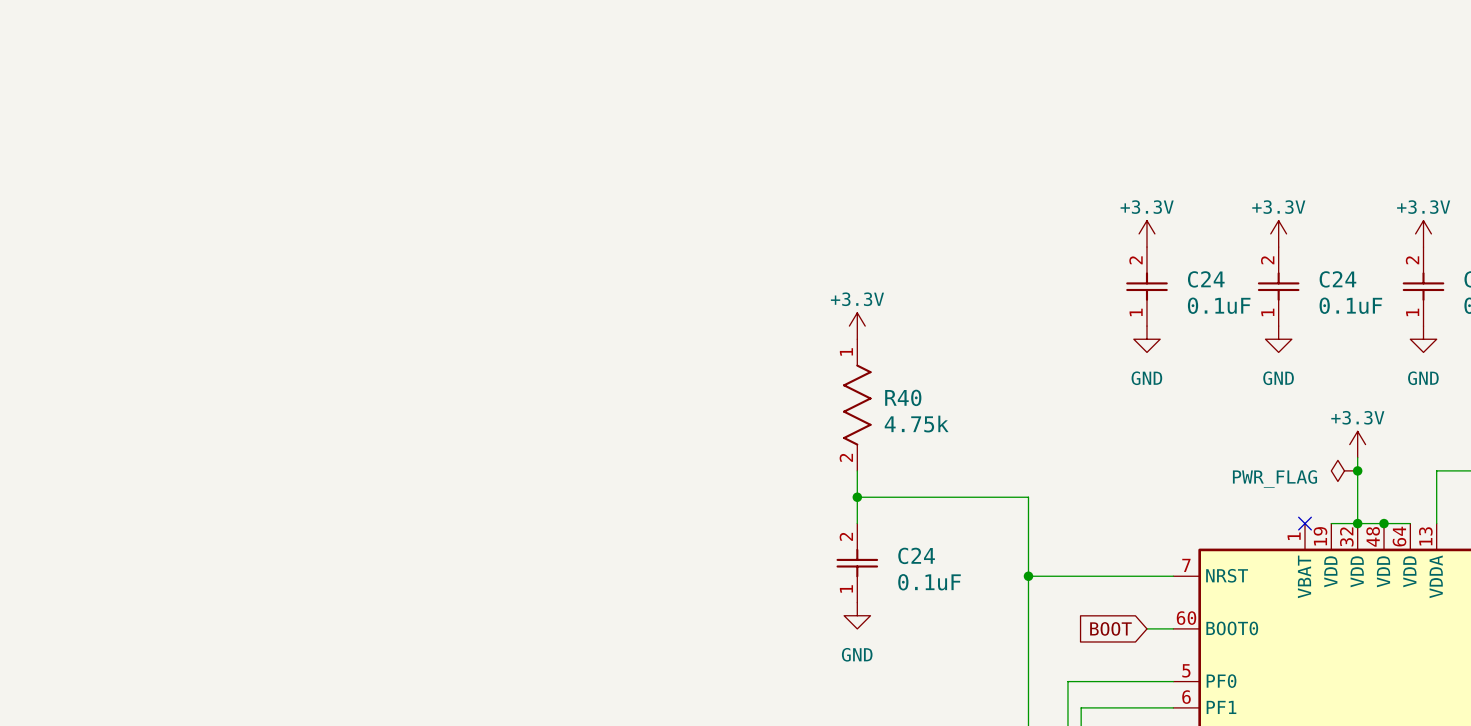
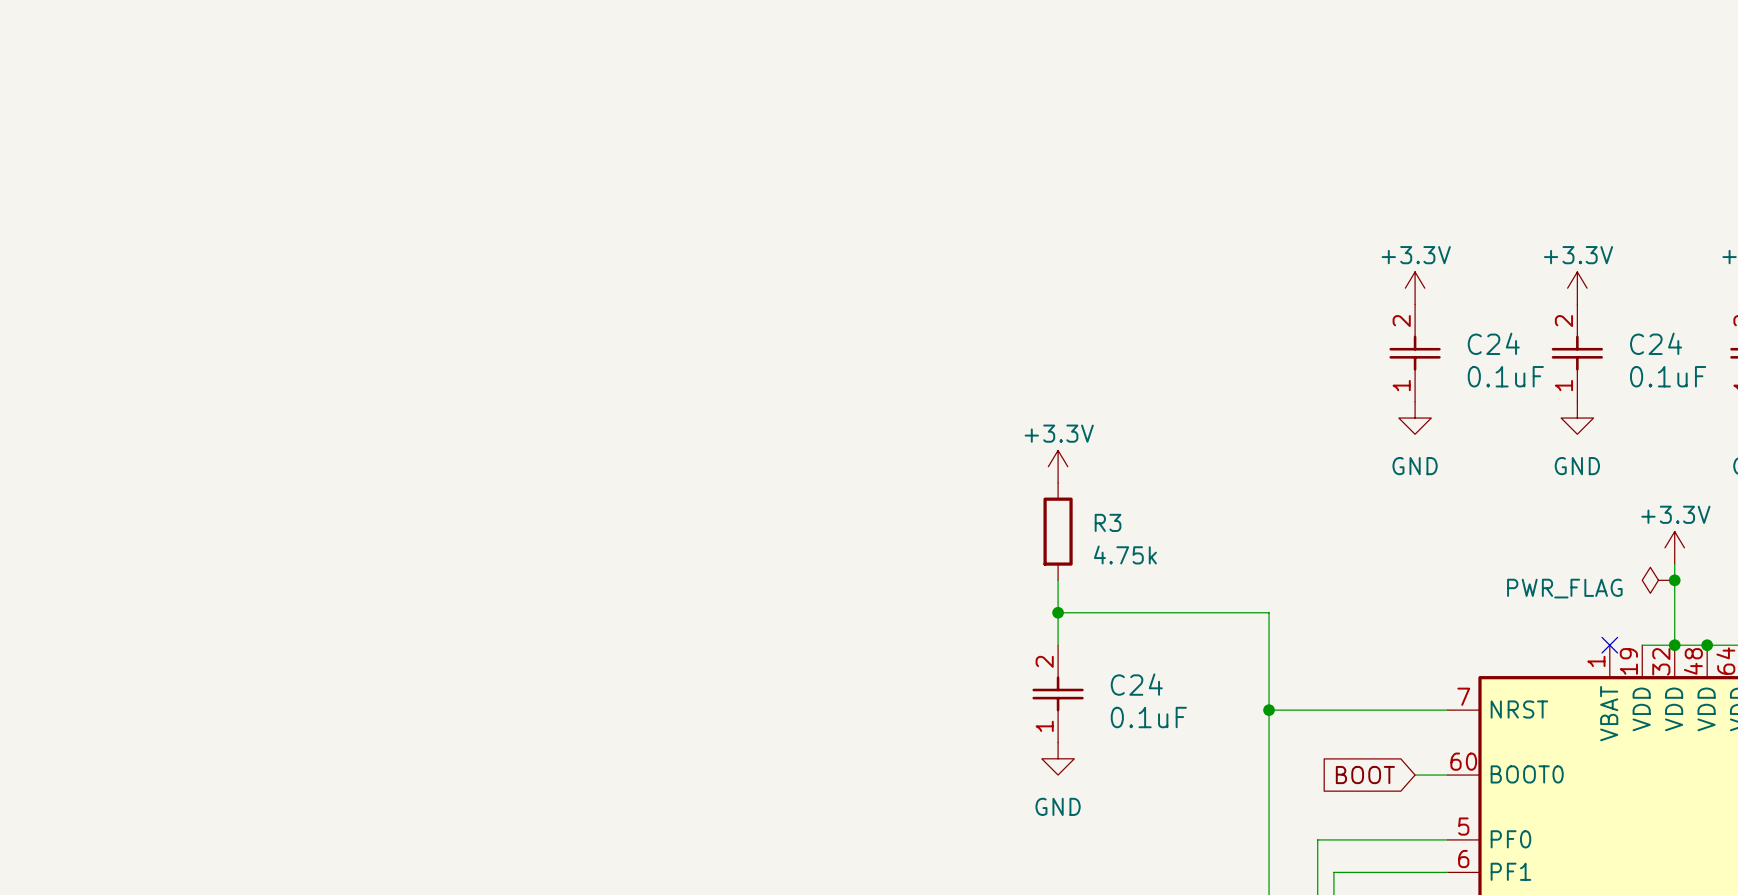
power symbol position: +3.3V (857, 326) -> +3.3V (1058, 466)
R40: 4.75k (857, 405) -> none
R3: none -> 4.75k (1058, 531)

